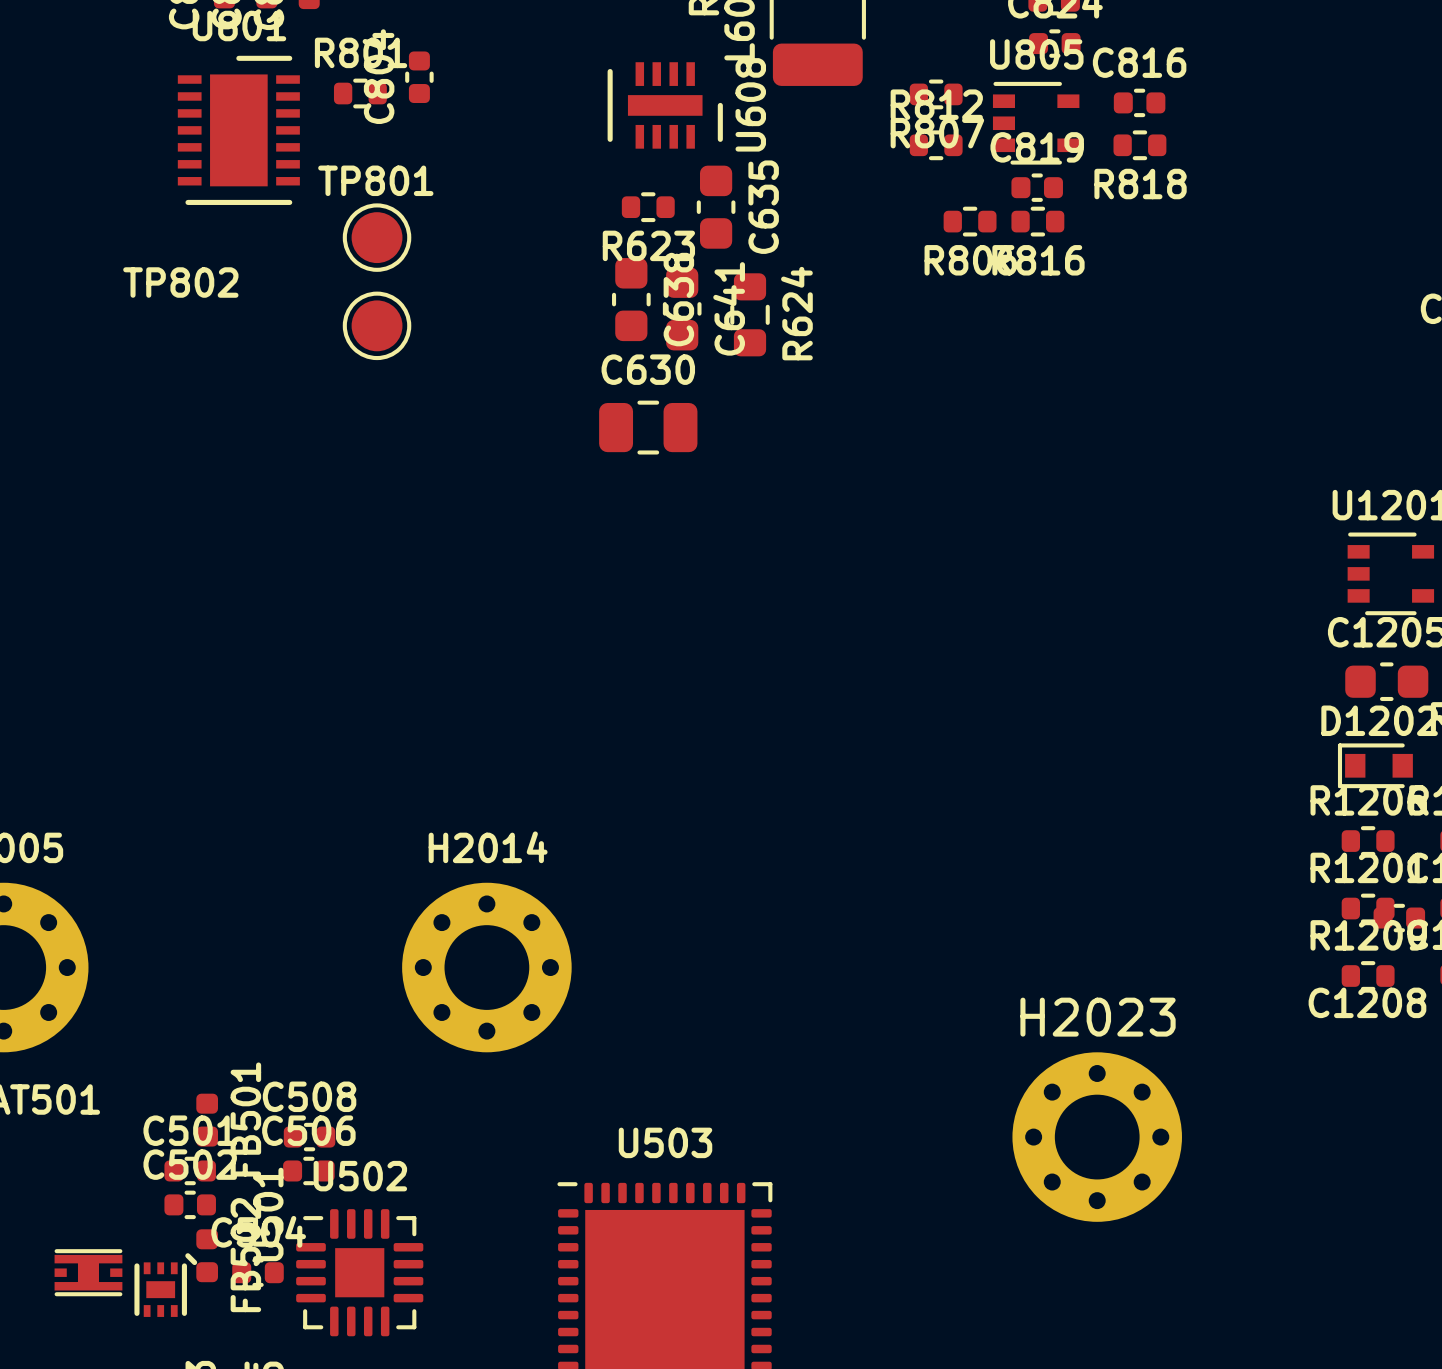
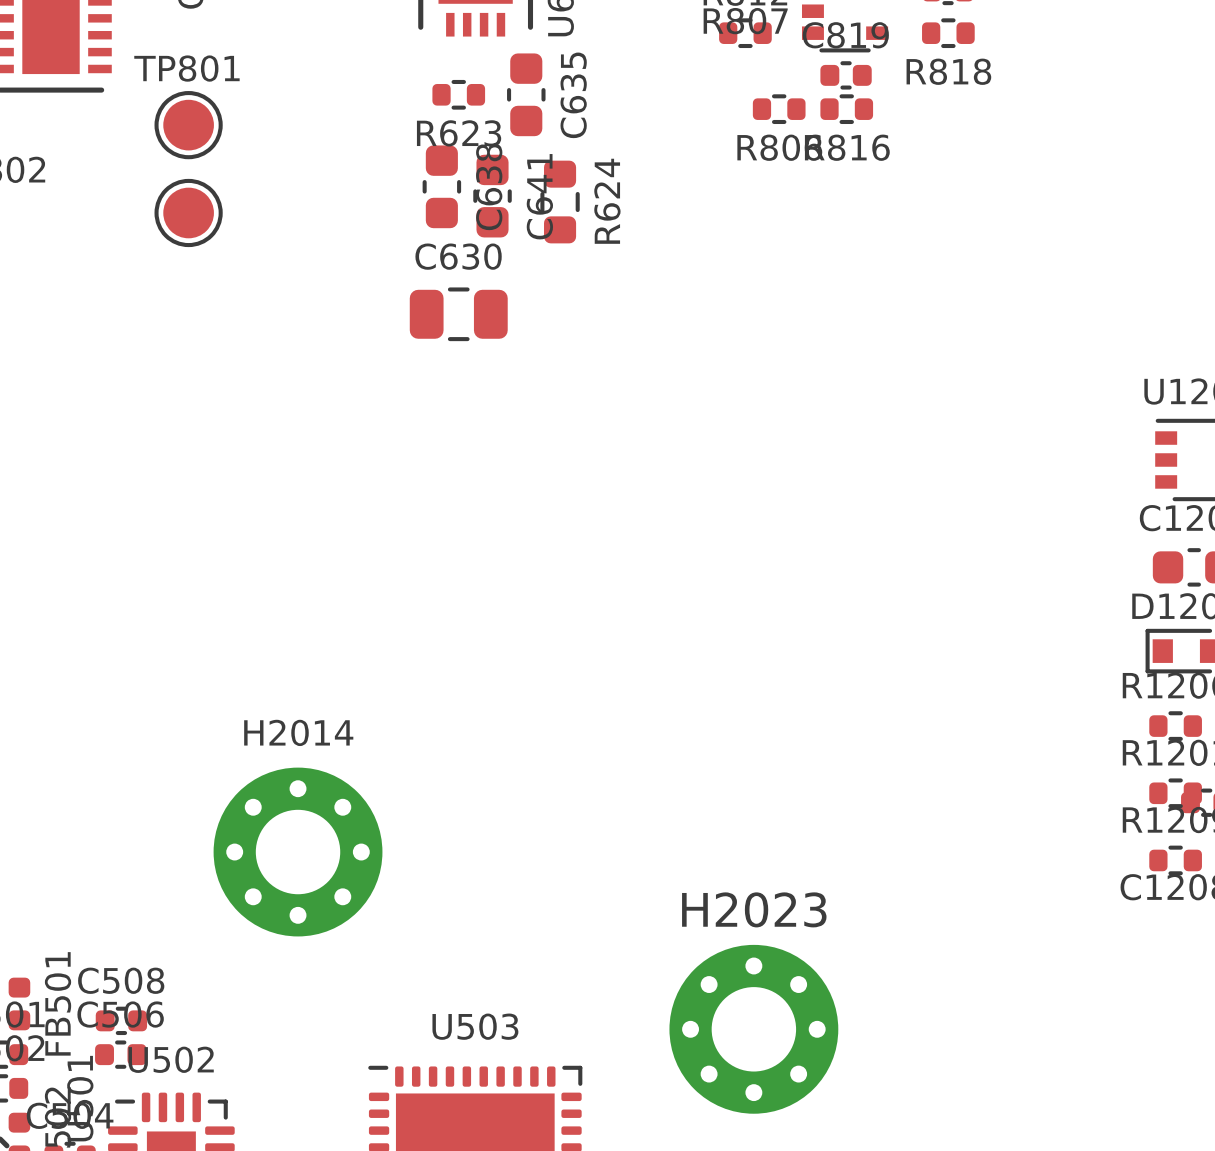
H2023 position: (1097, 1137) -> (753, 1029)

